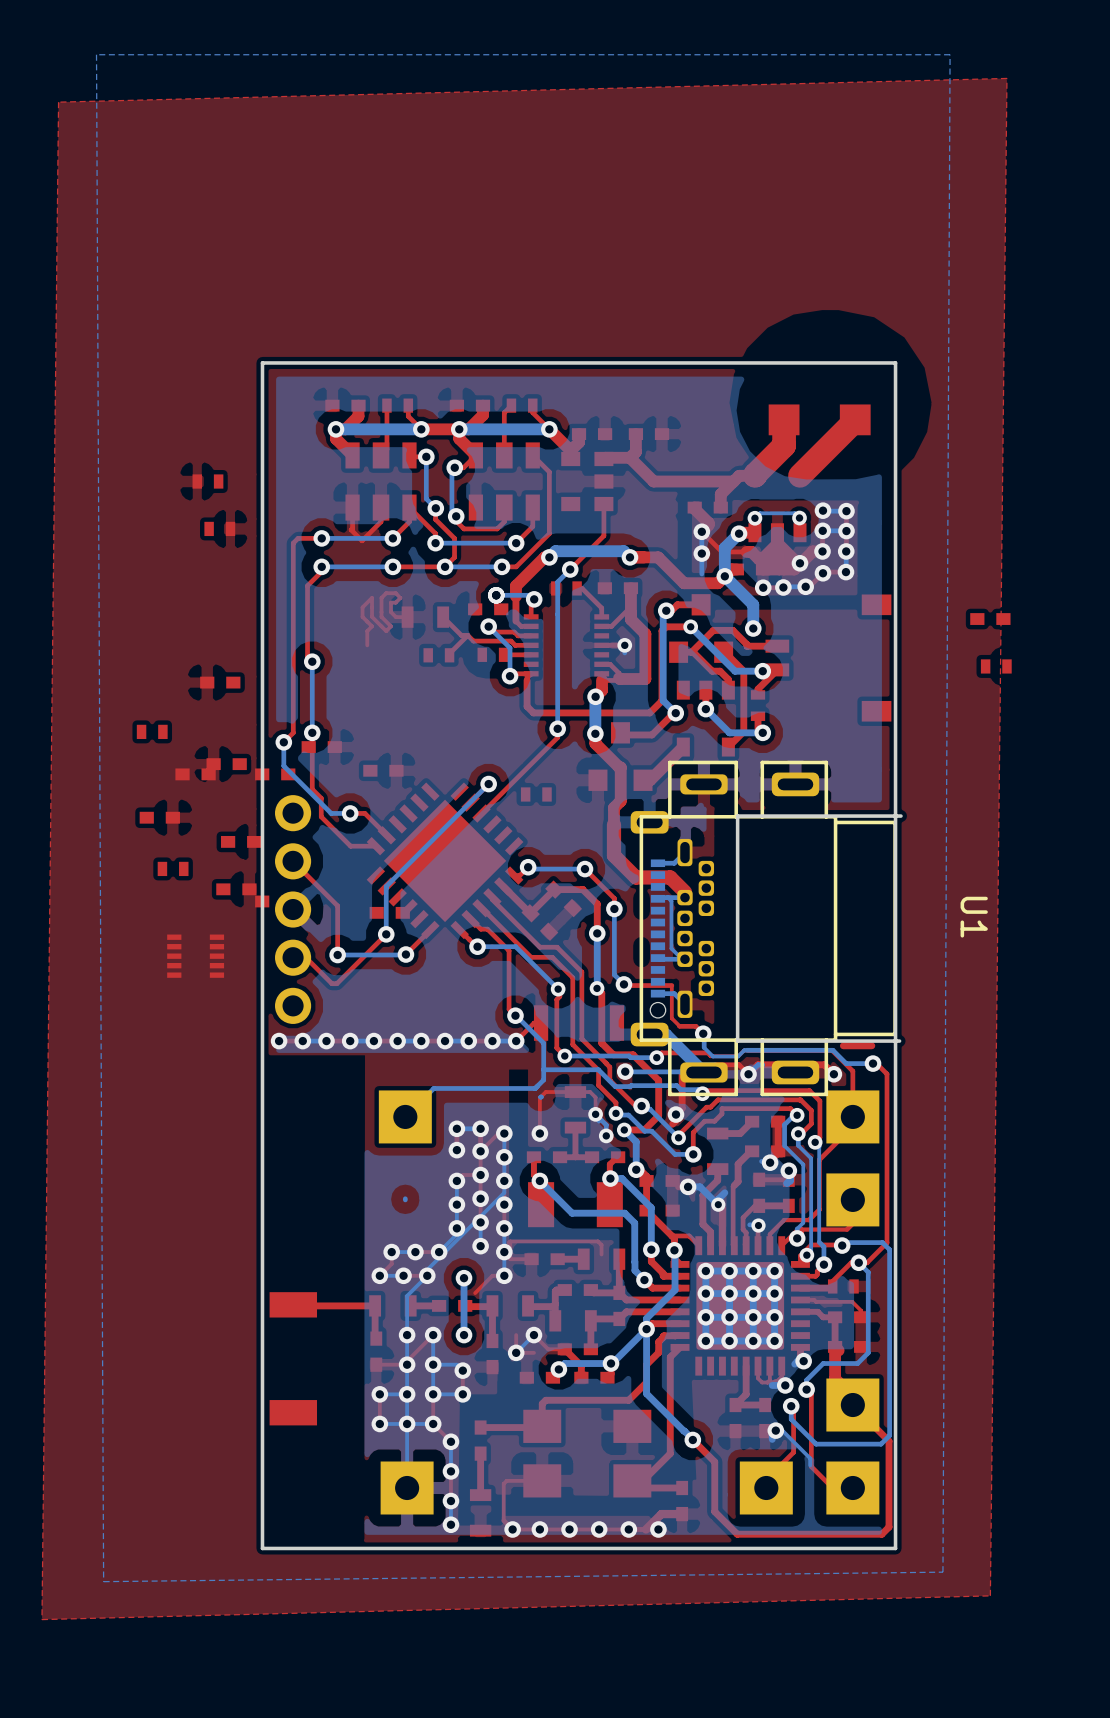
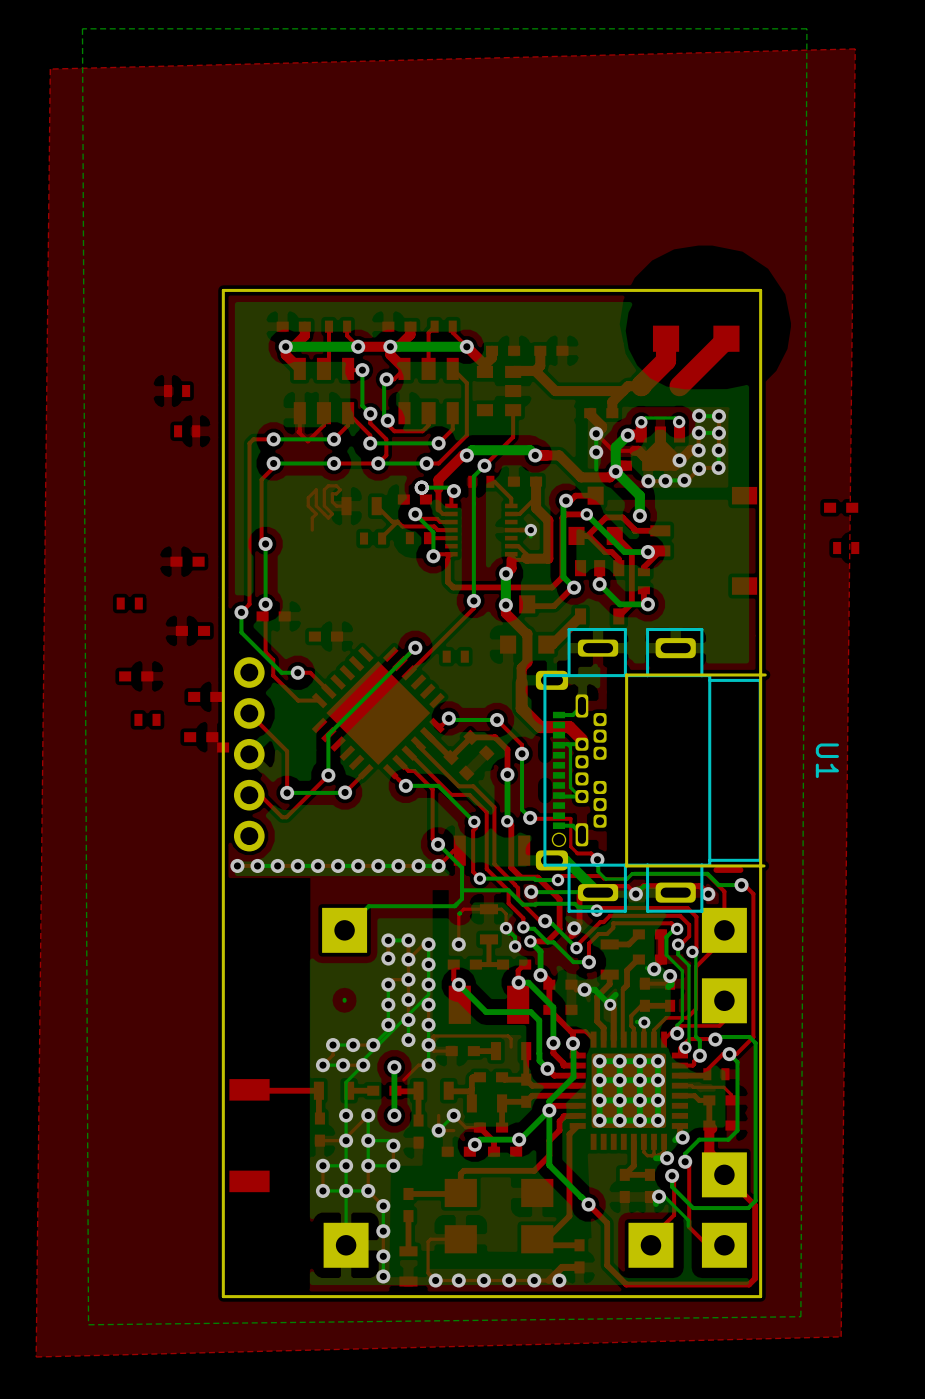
part: (195, 774) -> none
part: (275, 774) -> none
part: (389, 912) -> none
part: (195, 956) -> none

